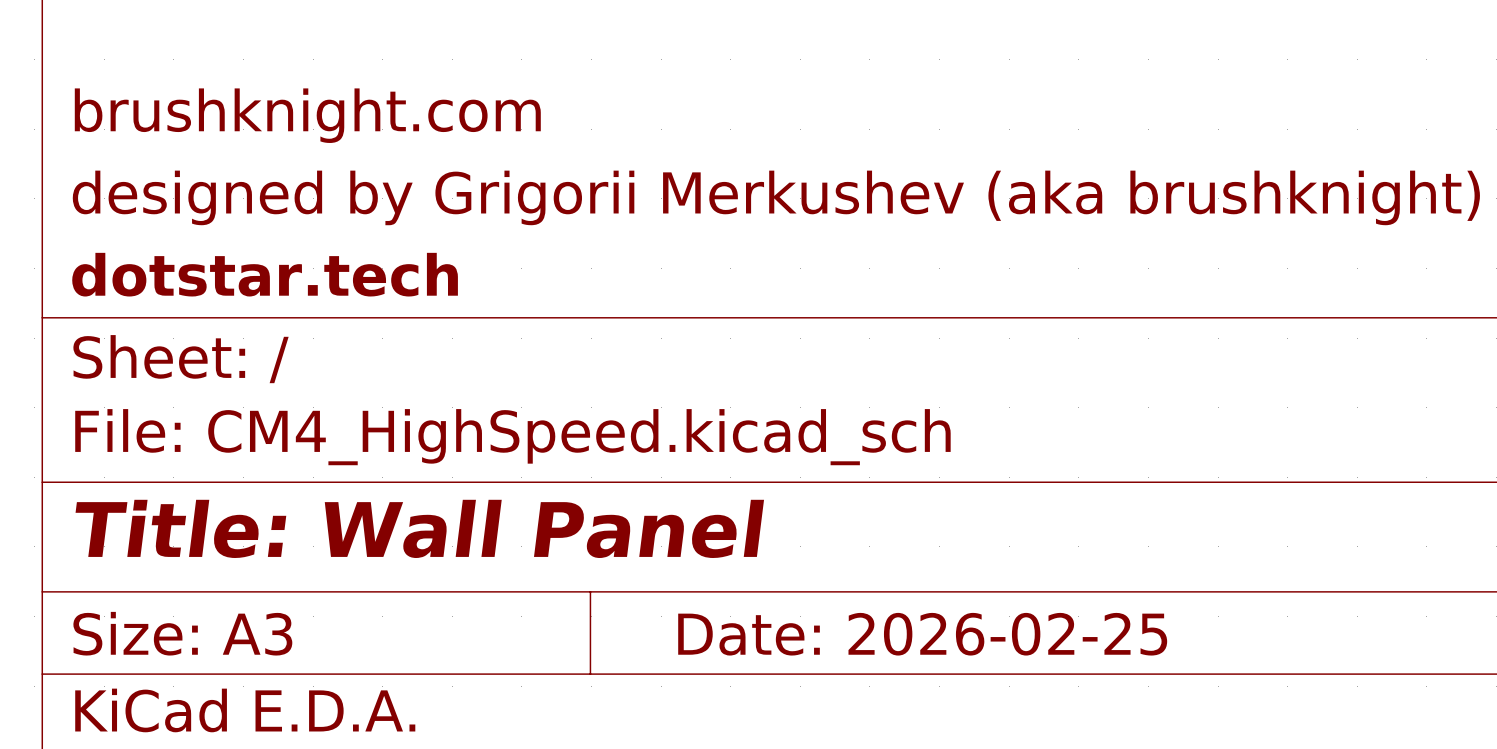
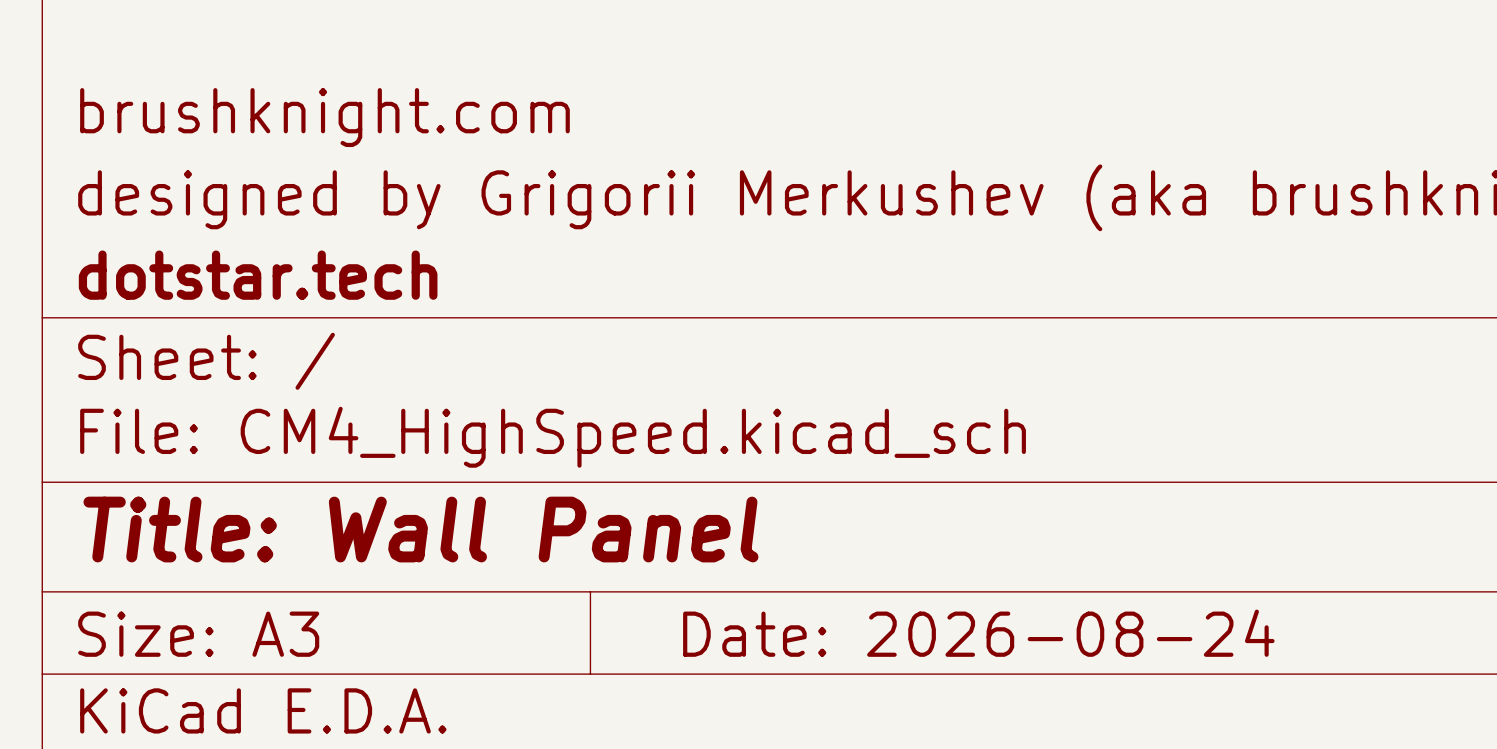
title block: Date: 2026-02-25 (922, 634) -> Date: 2026-08-24 (978, 633)

